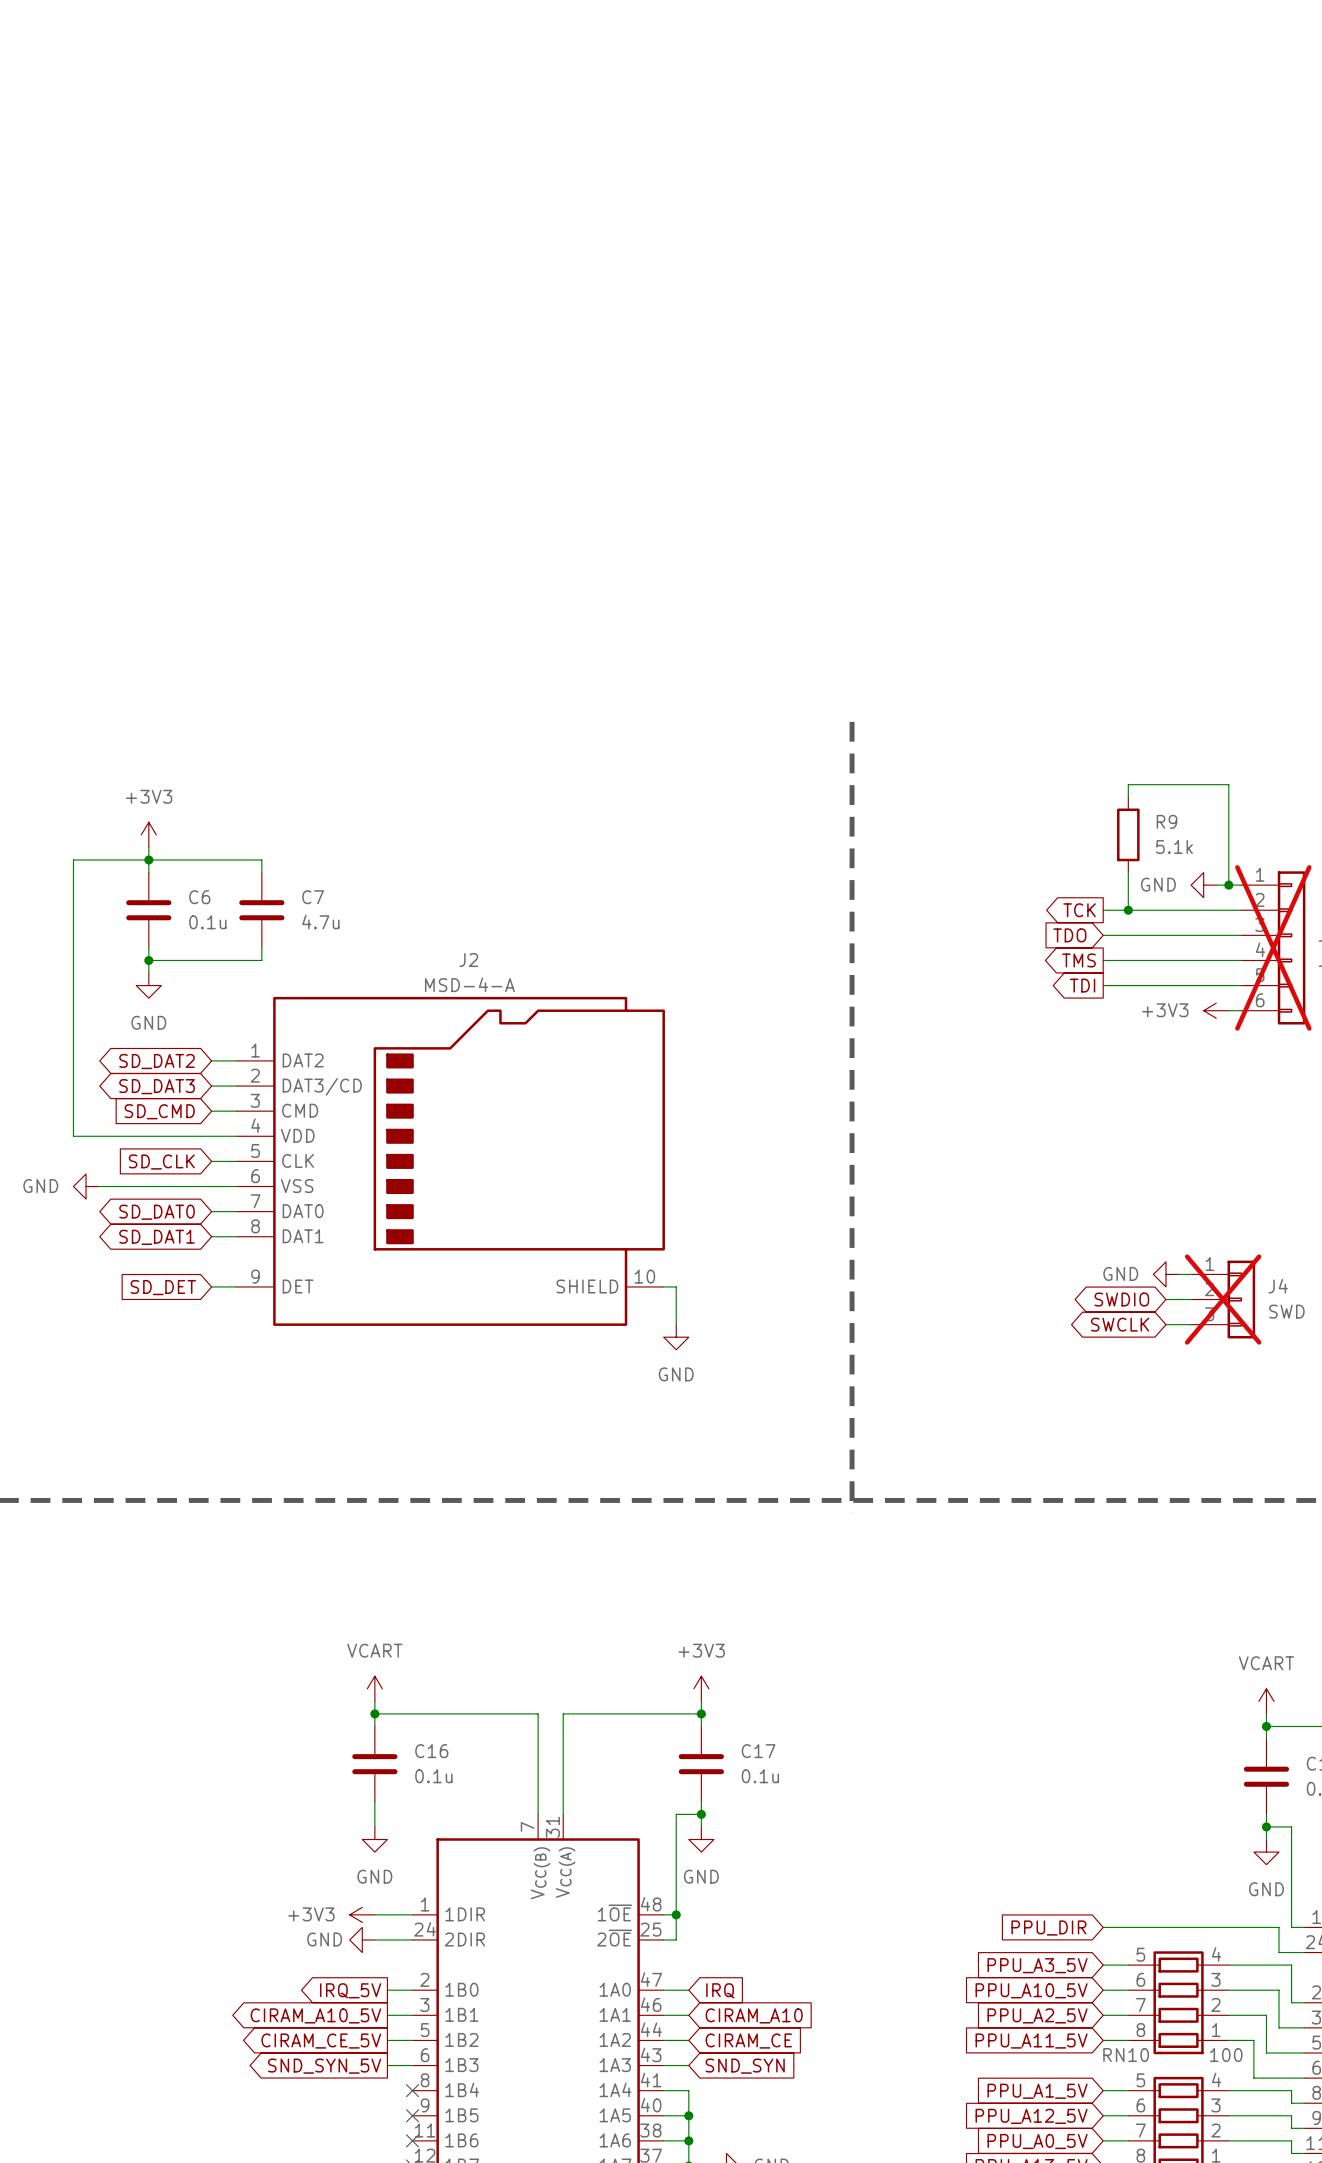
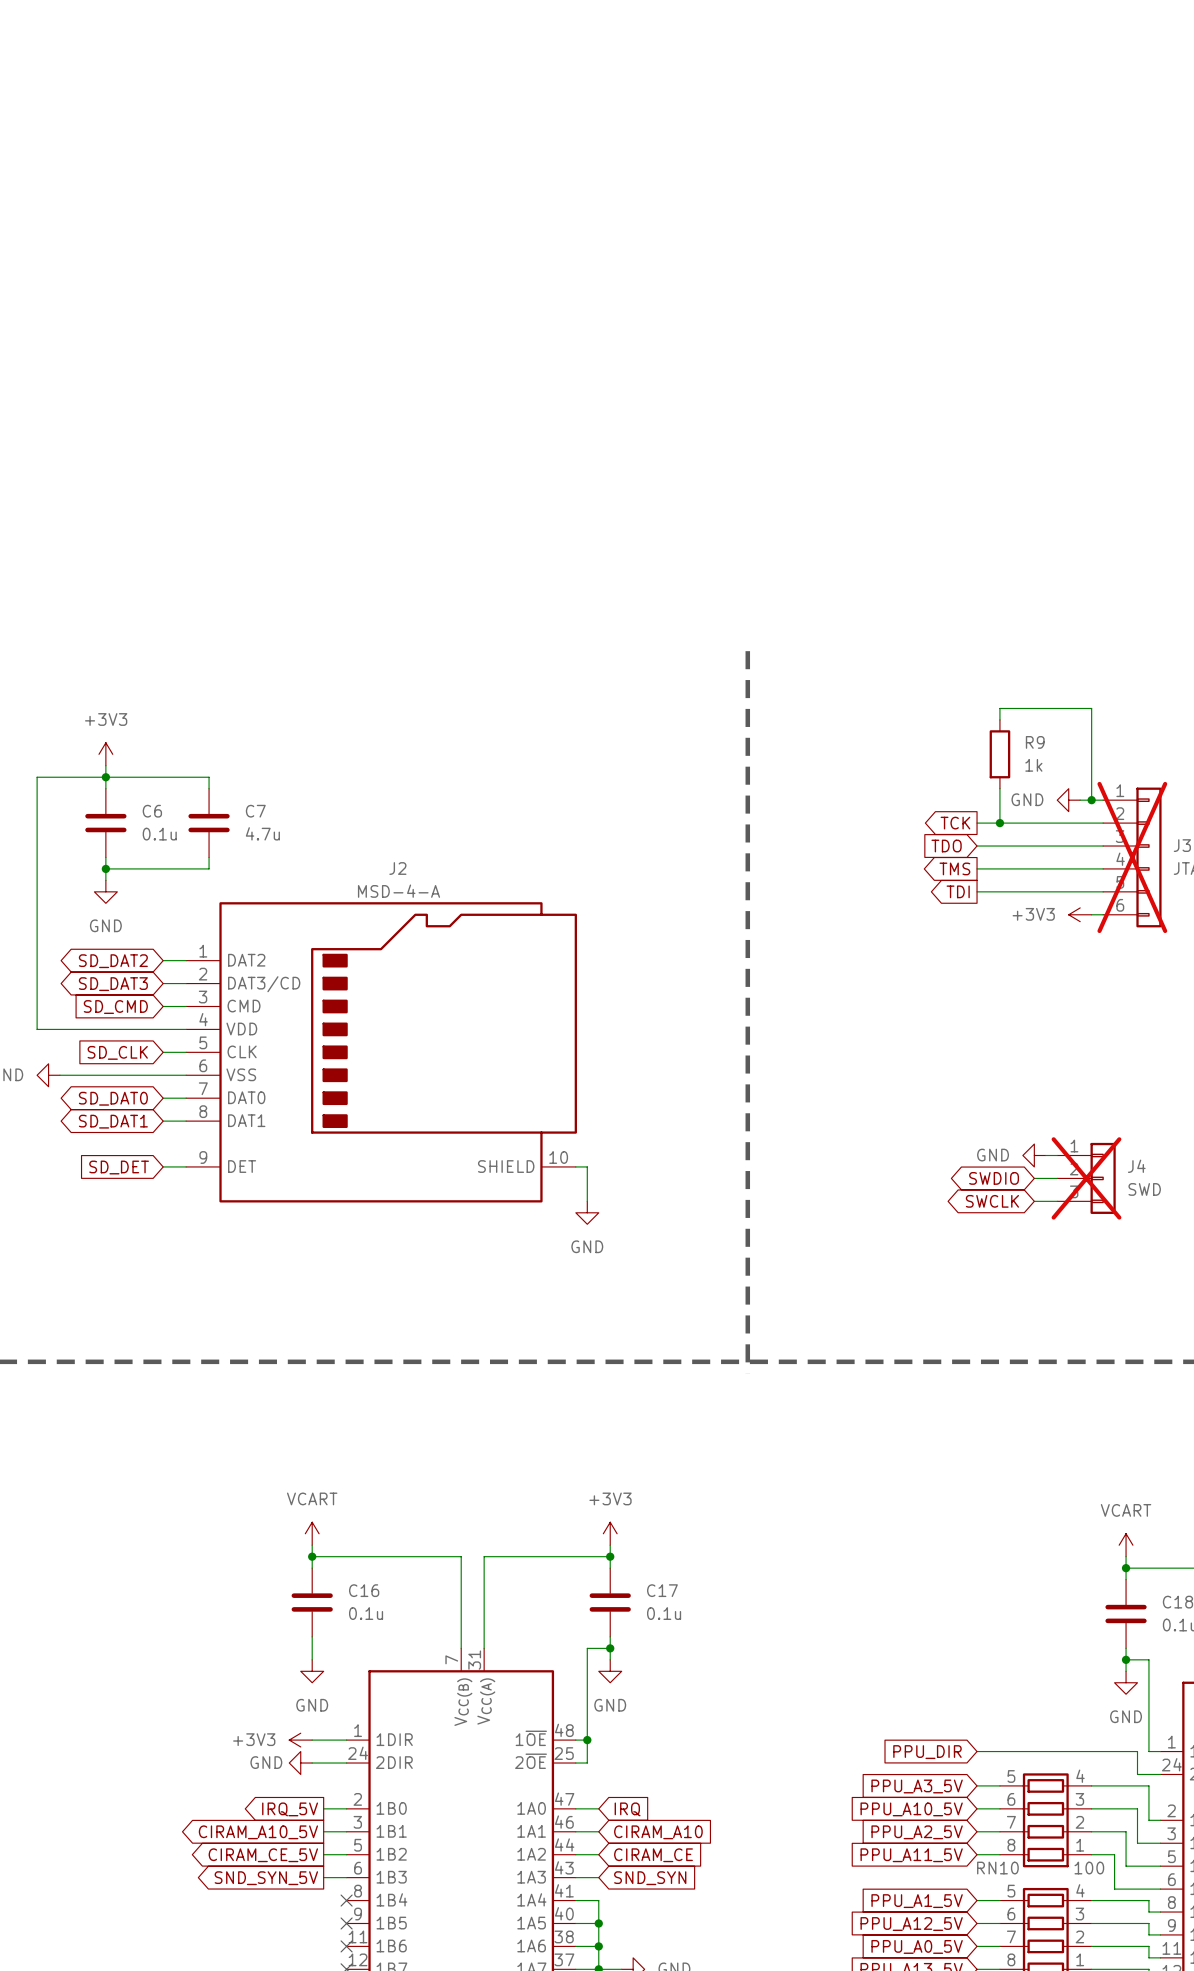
R9 value: 5.1k (1174, 846) -> 1k (1033, 765)

